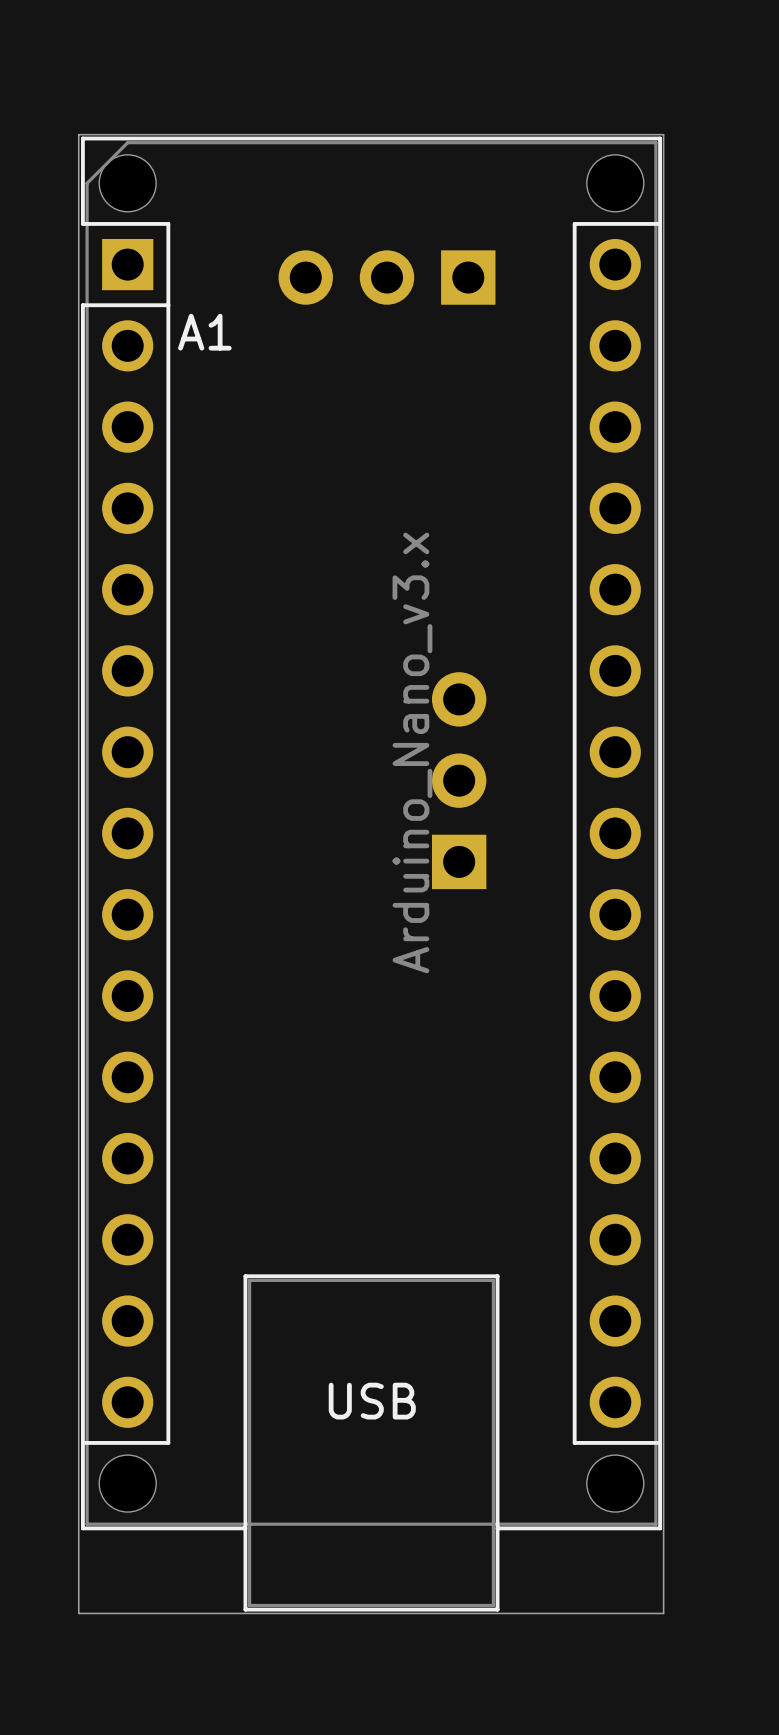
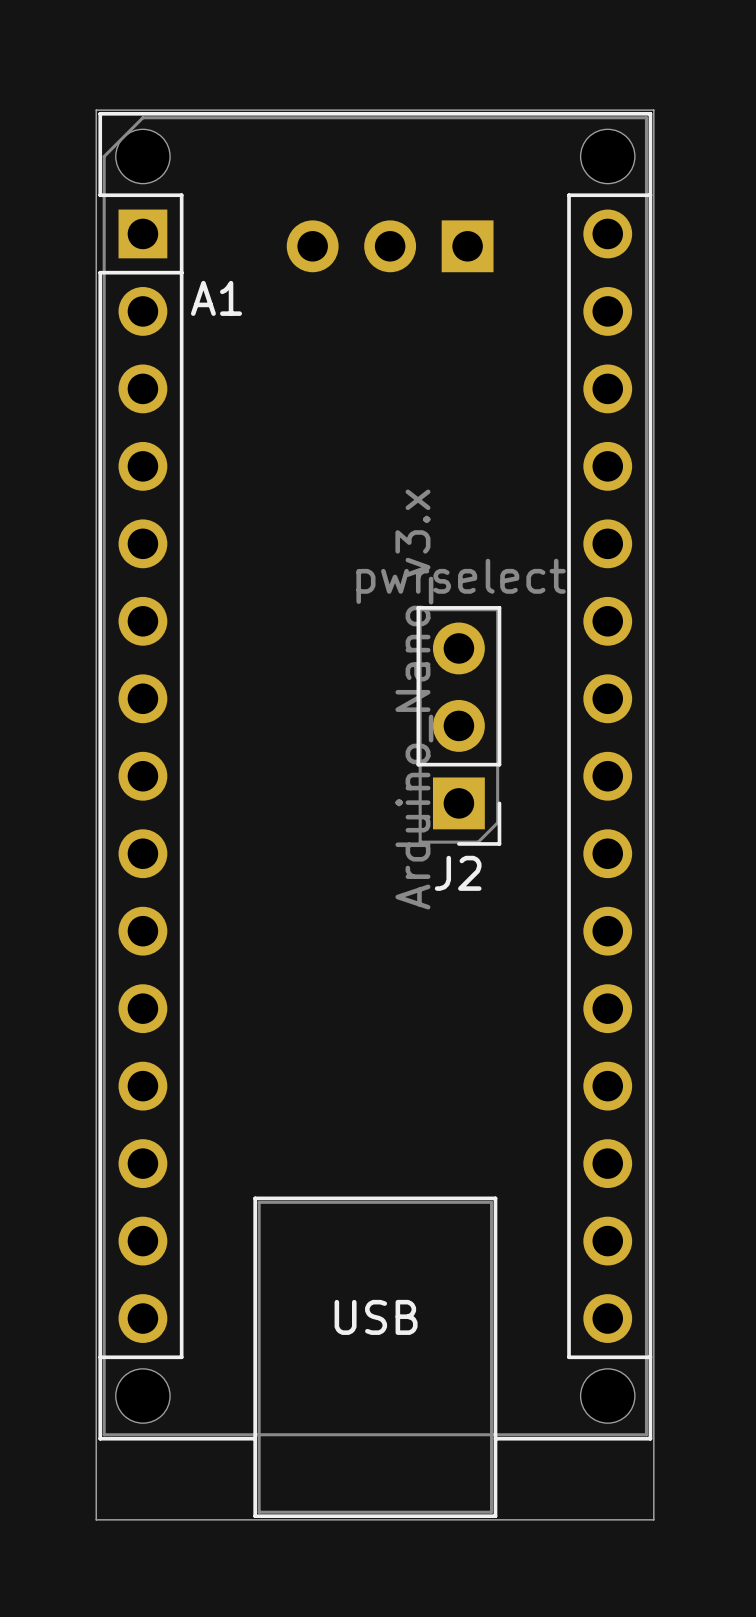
J2 side: bottom (459, 780) -> top (458, 725)

